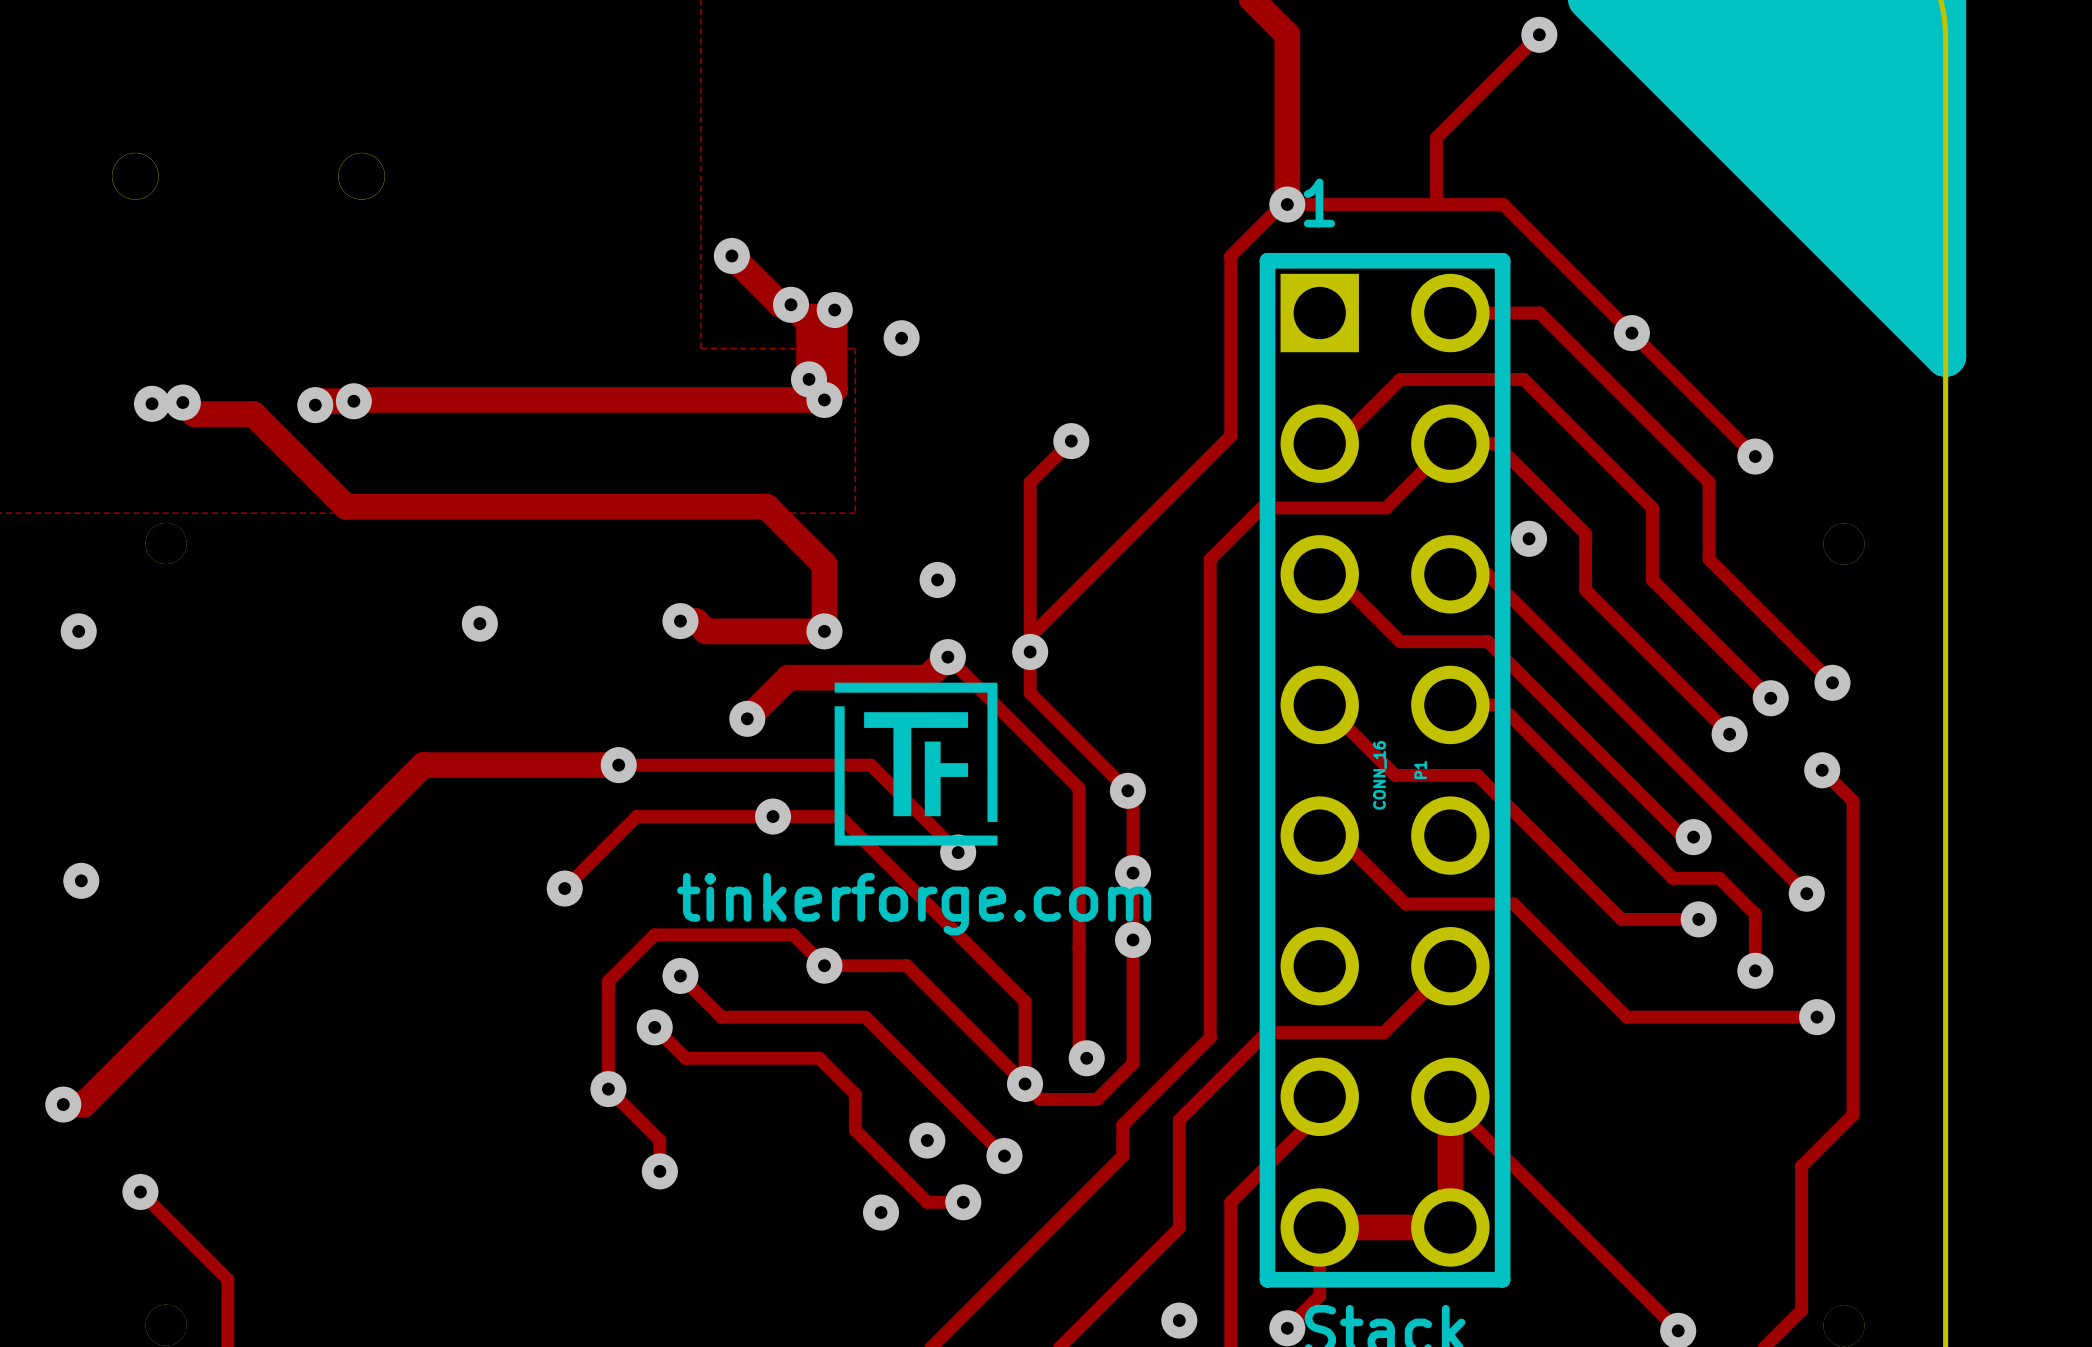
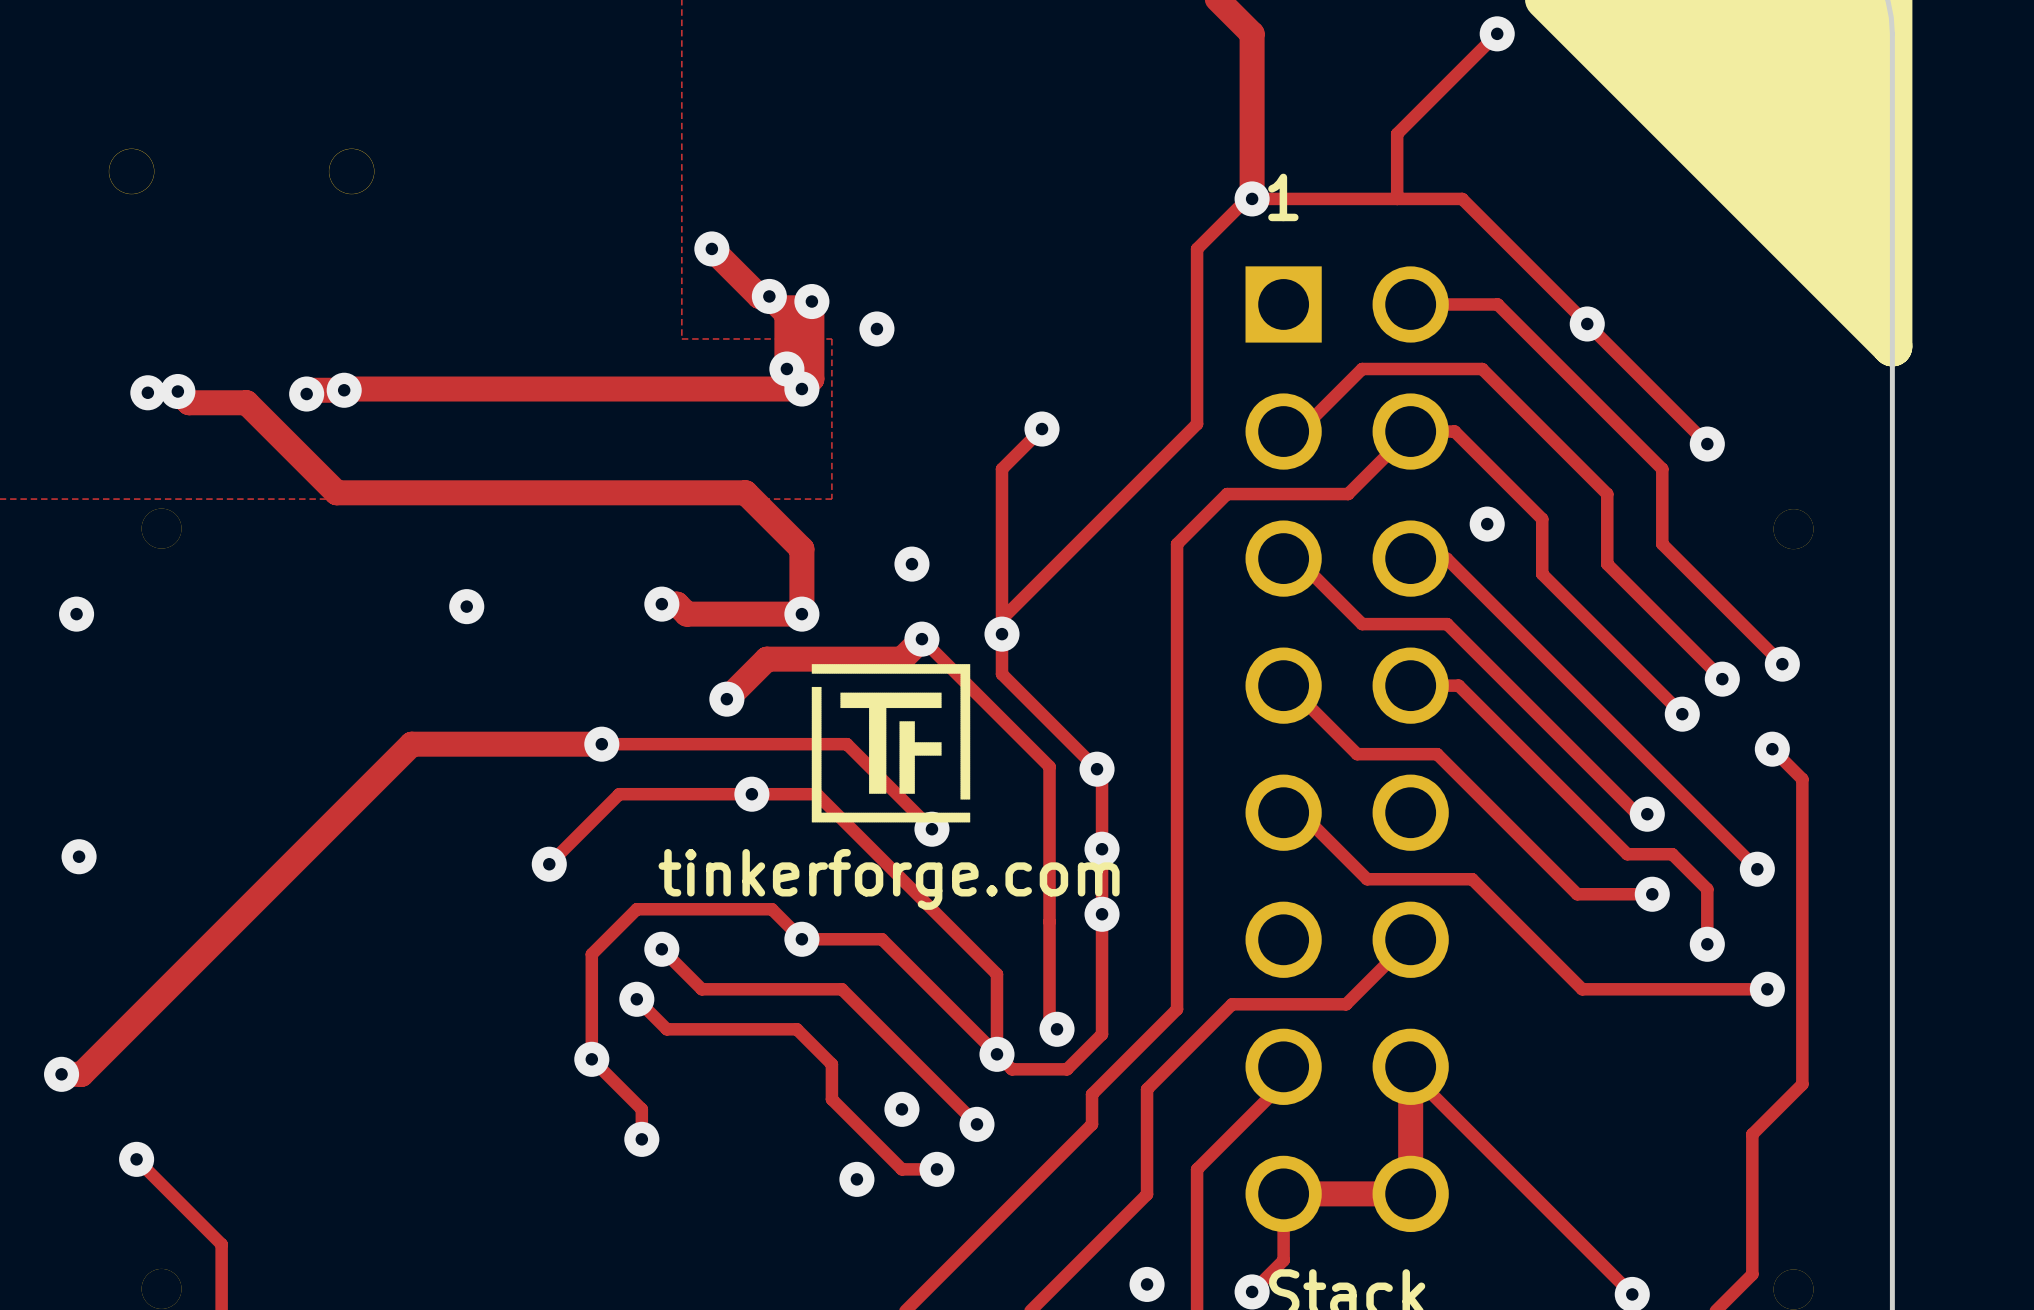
P1: CONN_16 (1385, 770) -> none

